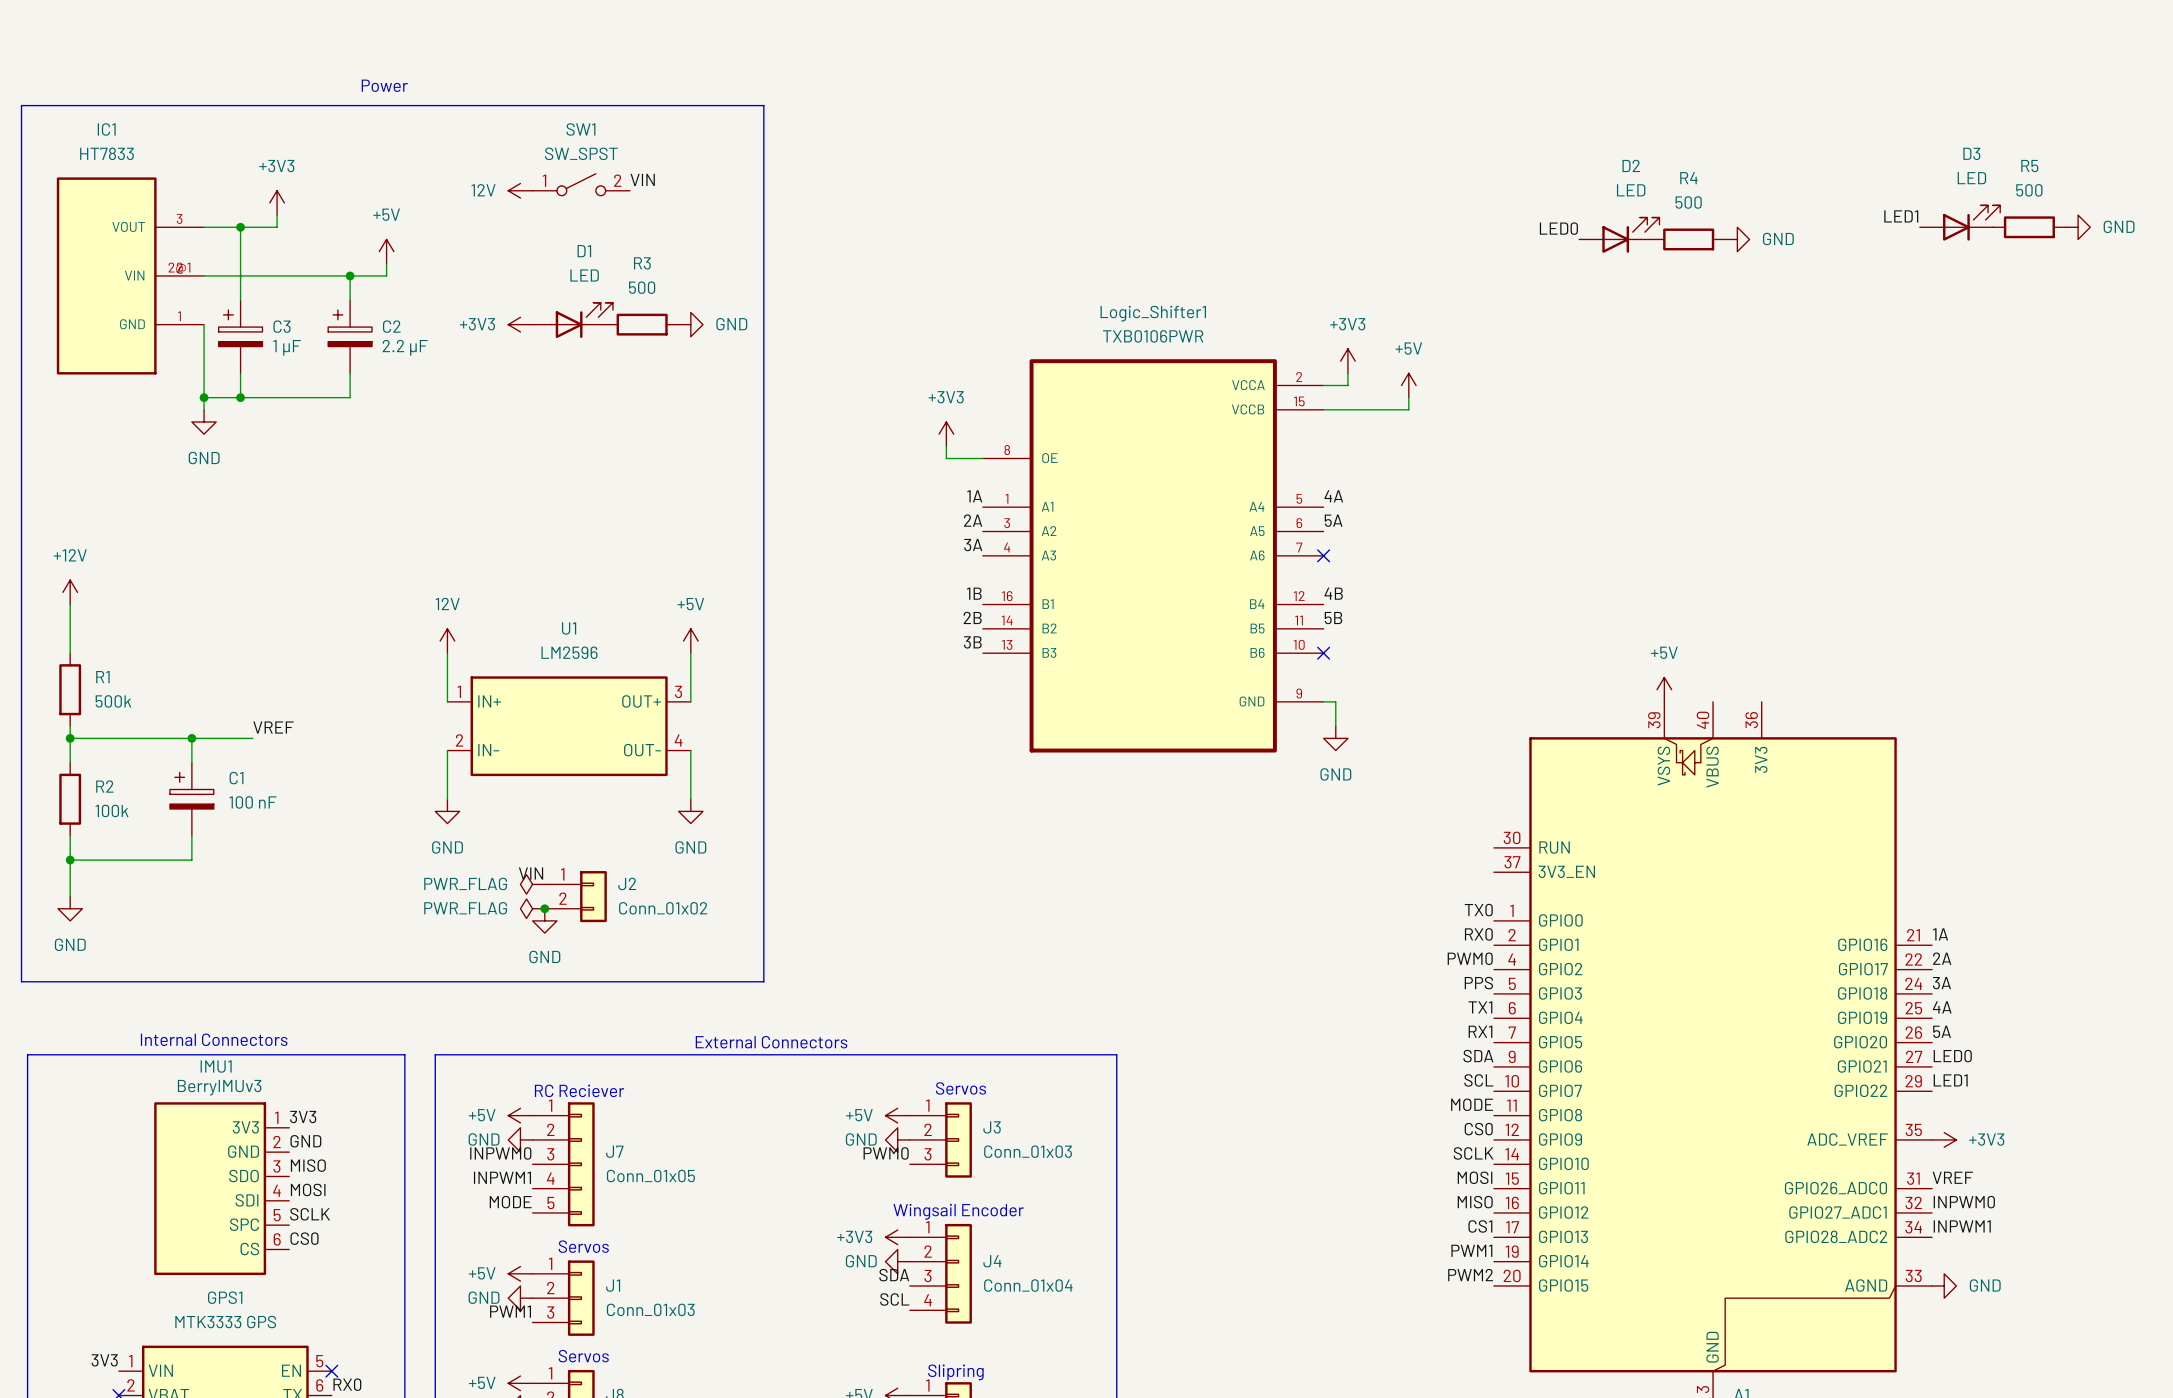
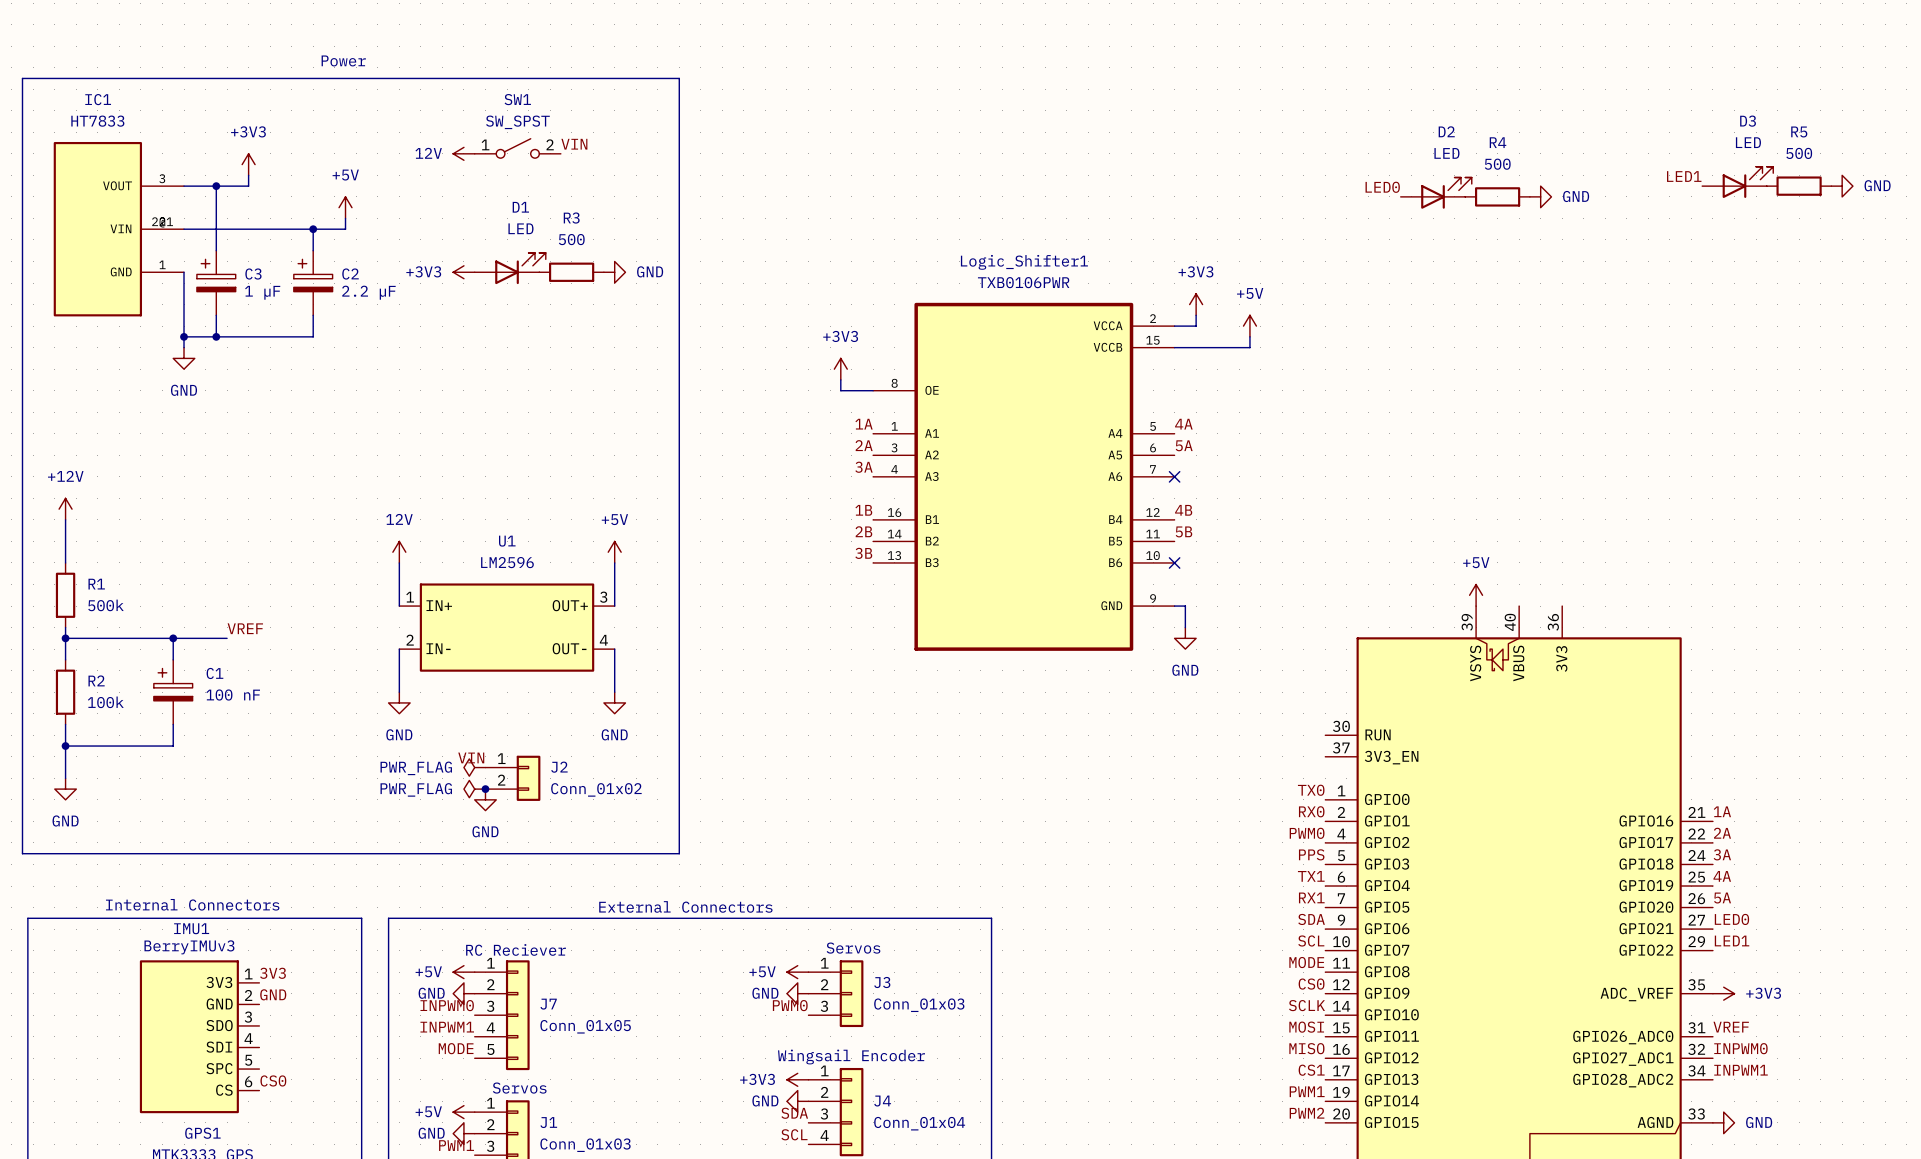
label: MISO (308, 1165) -> none
label: MOSI (308, 1189) -> none
label: SCLK (310, 1214) -> none

